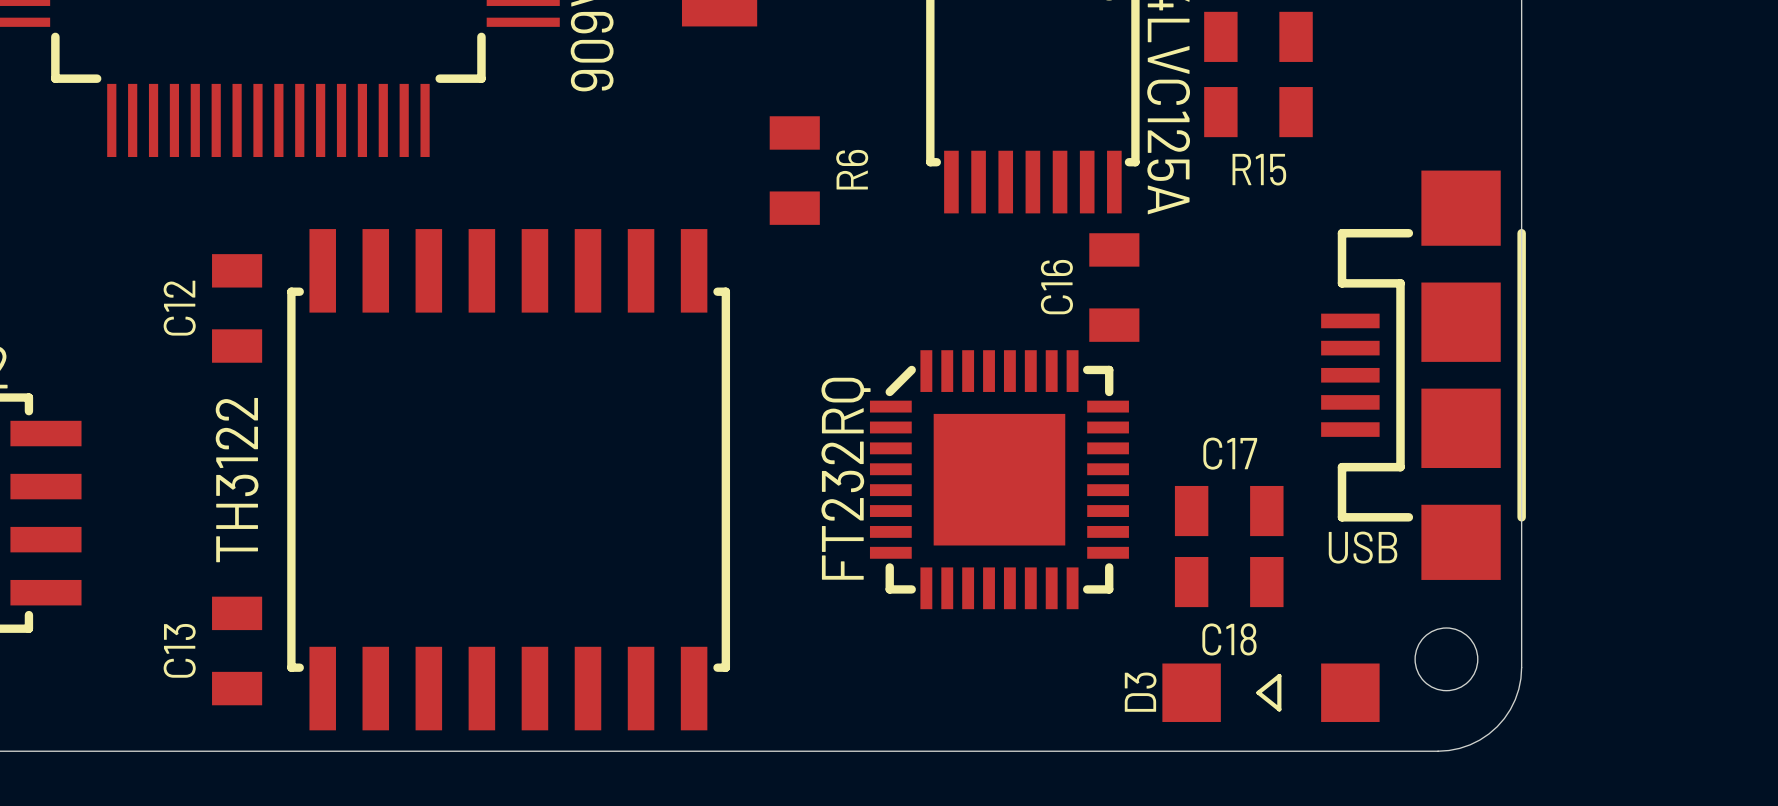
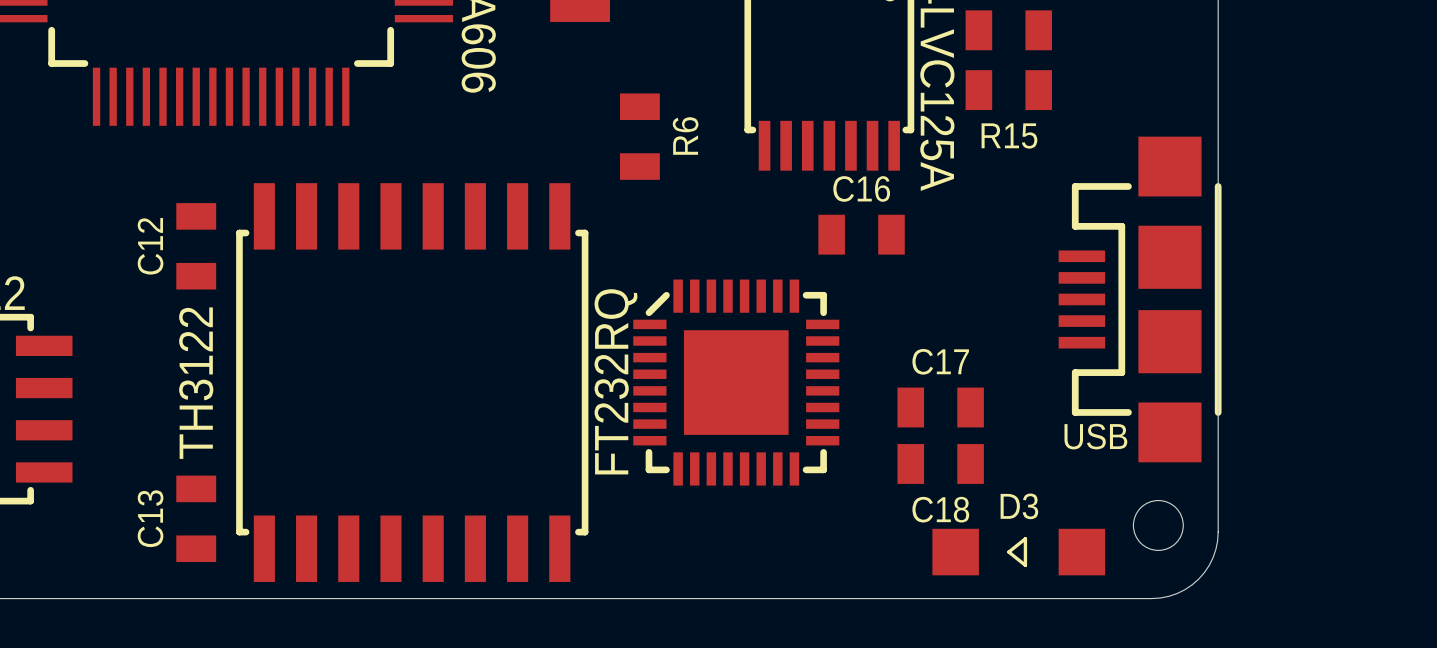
C16 rotation: 0° (1114, 287) -> 90° clockwise (861, 234)
FT232RQ position: (999, 479) -> (736, 382)
C17 position: (1229, 511) -> (940, 407)
C18 position: (1229, 582) -> (940, 463)
D3 name rotation: 0° (1140, 692) -> 90° clockwise (1019, 506)
D3 name position: D3 (1140, 692) -> D3 (1019, 506)

